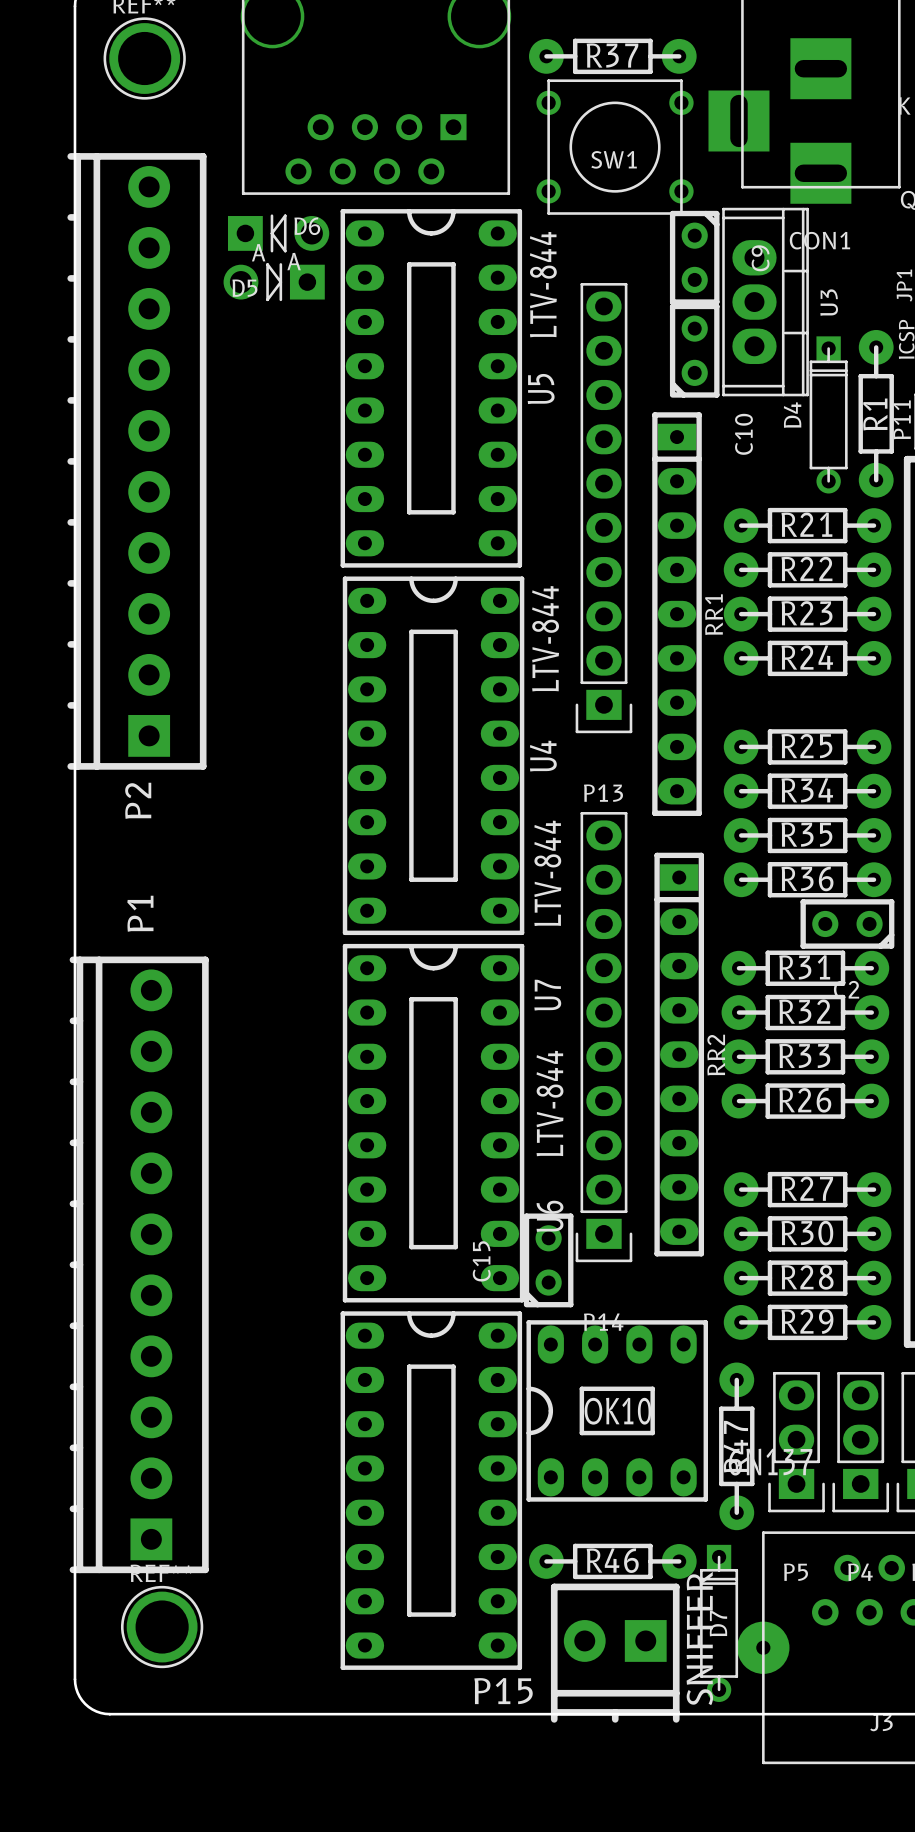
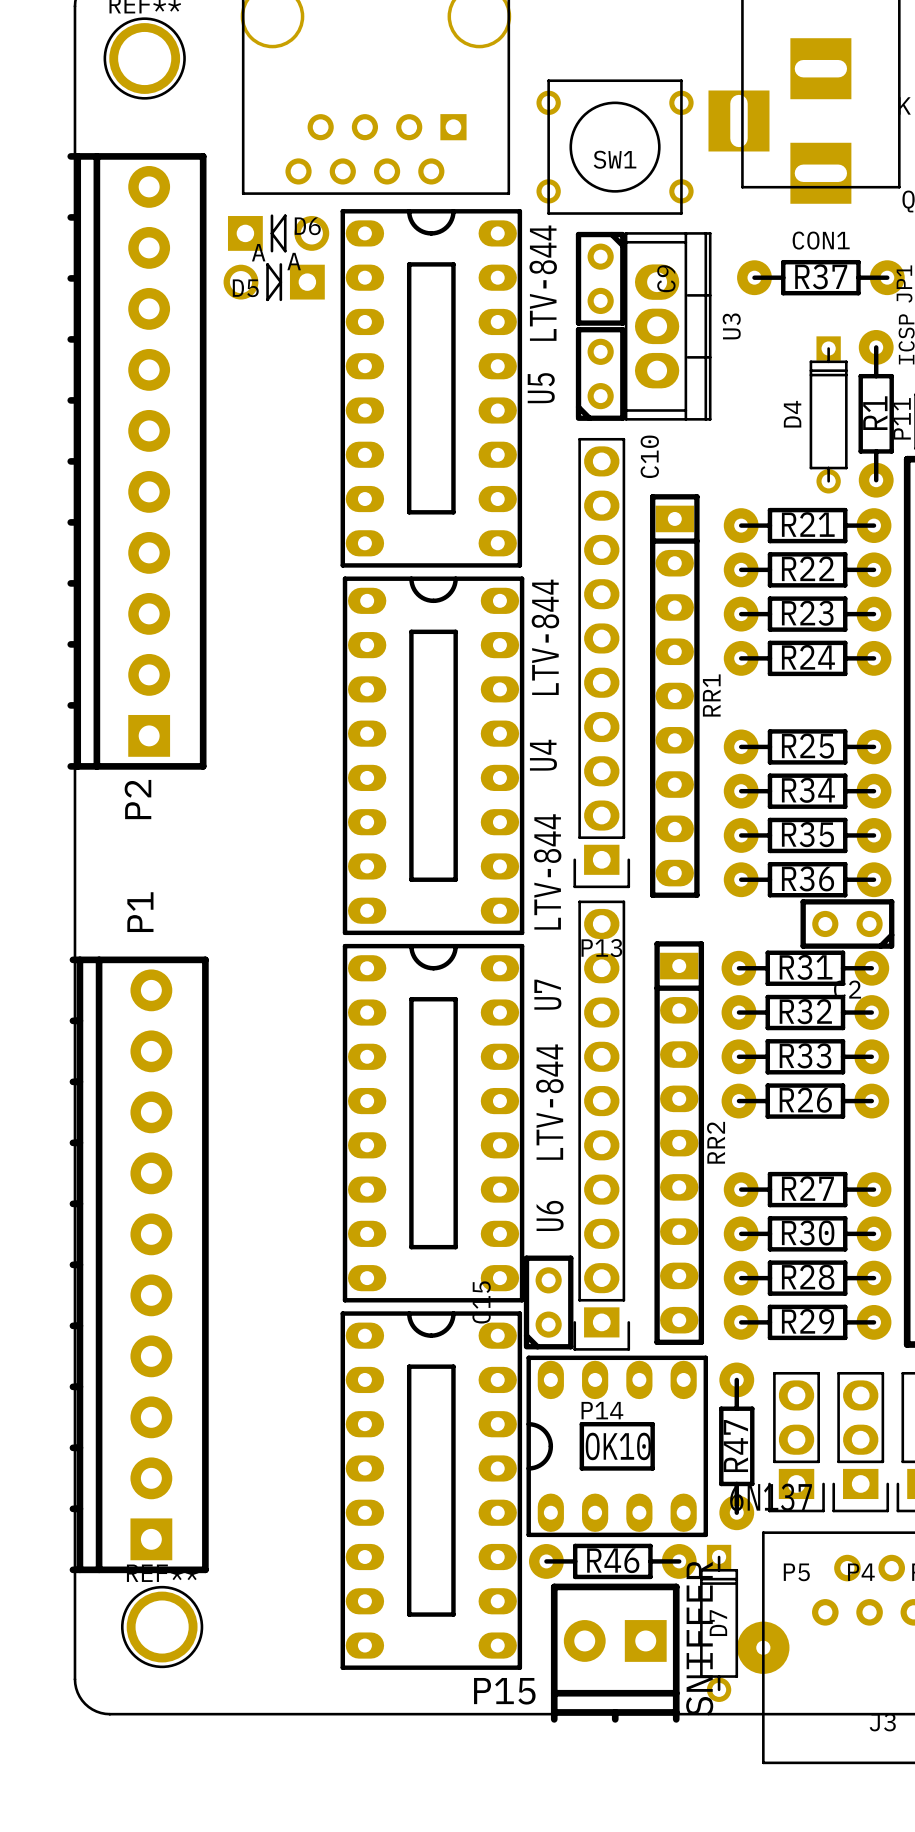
R37 position: (612, 56) -> (820, 277)
C9 position: (694, 257) -> (600, 278)
U3 position: (765, 302) -> (668, 326)
C10 position: (694, 350) -> (600, 373)
P13 position: (603, 508) -> (601, 663)
RR1 position: (677, 614) -> (674, 696)
P14 position: (603, 1037) -> (601, 1125)
RR2 position: (679, 1054) -> (679, 1143)
C15 position: (548, 1260) -> (548, 1302)
OK10 position: (617, 1410) -> (617, 1446)

